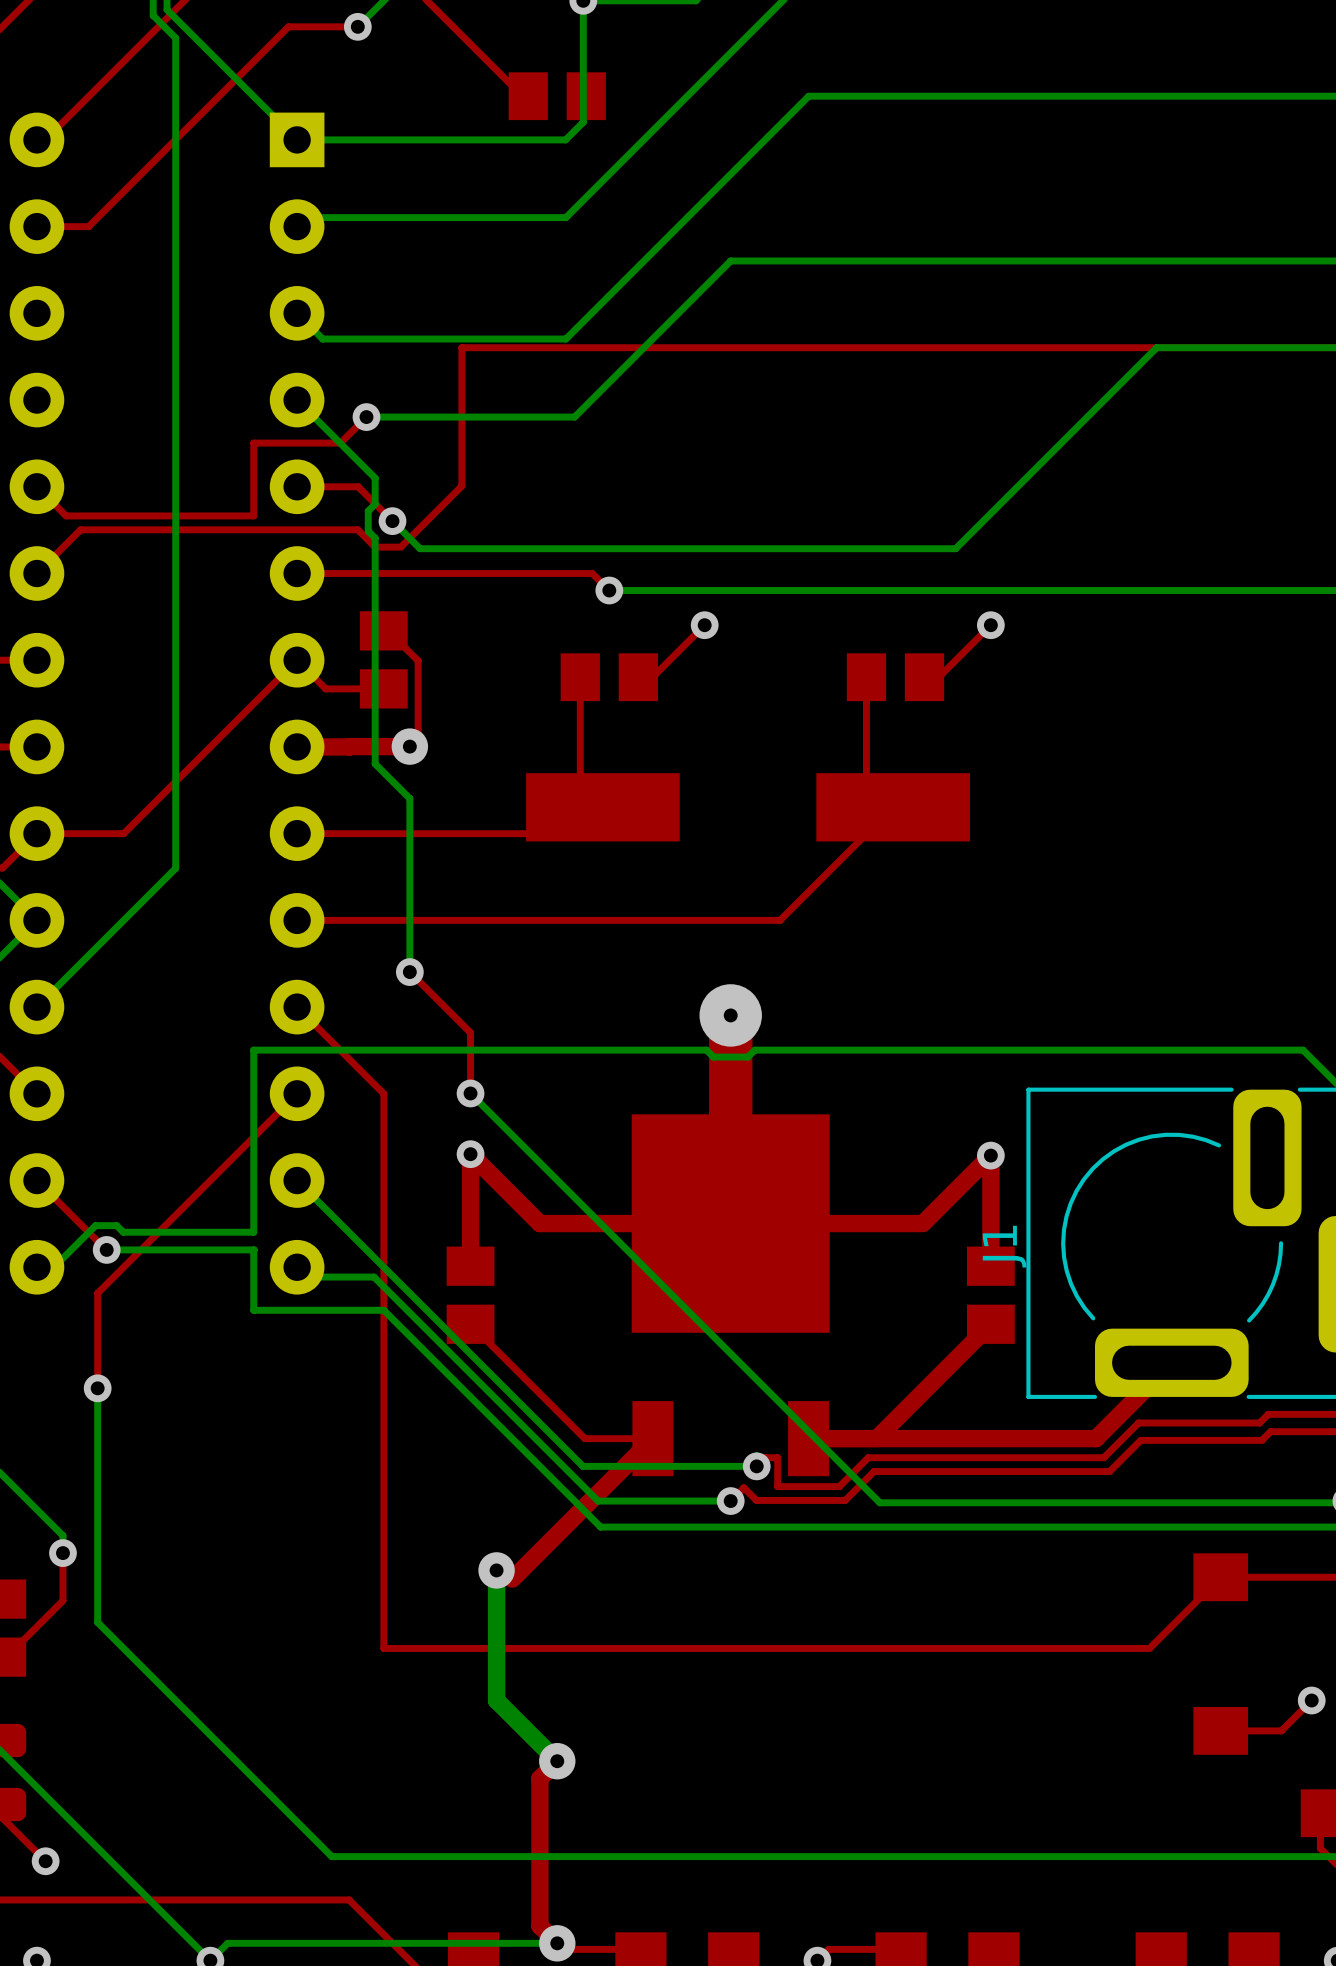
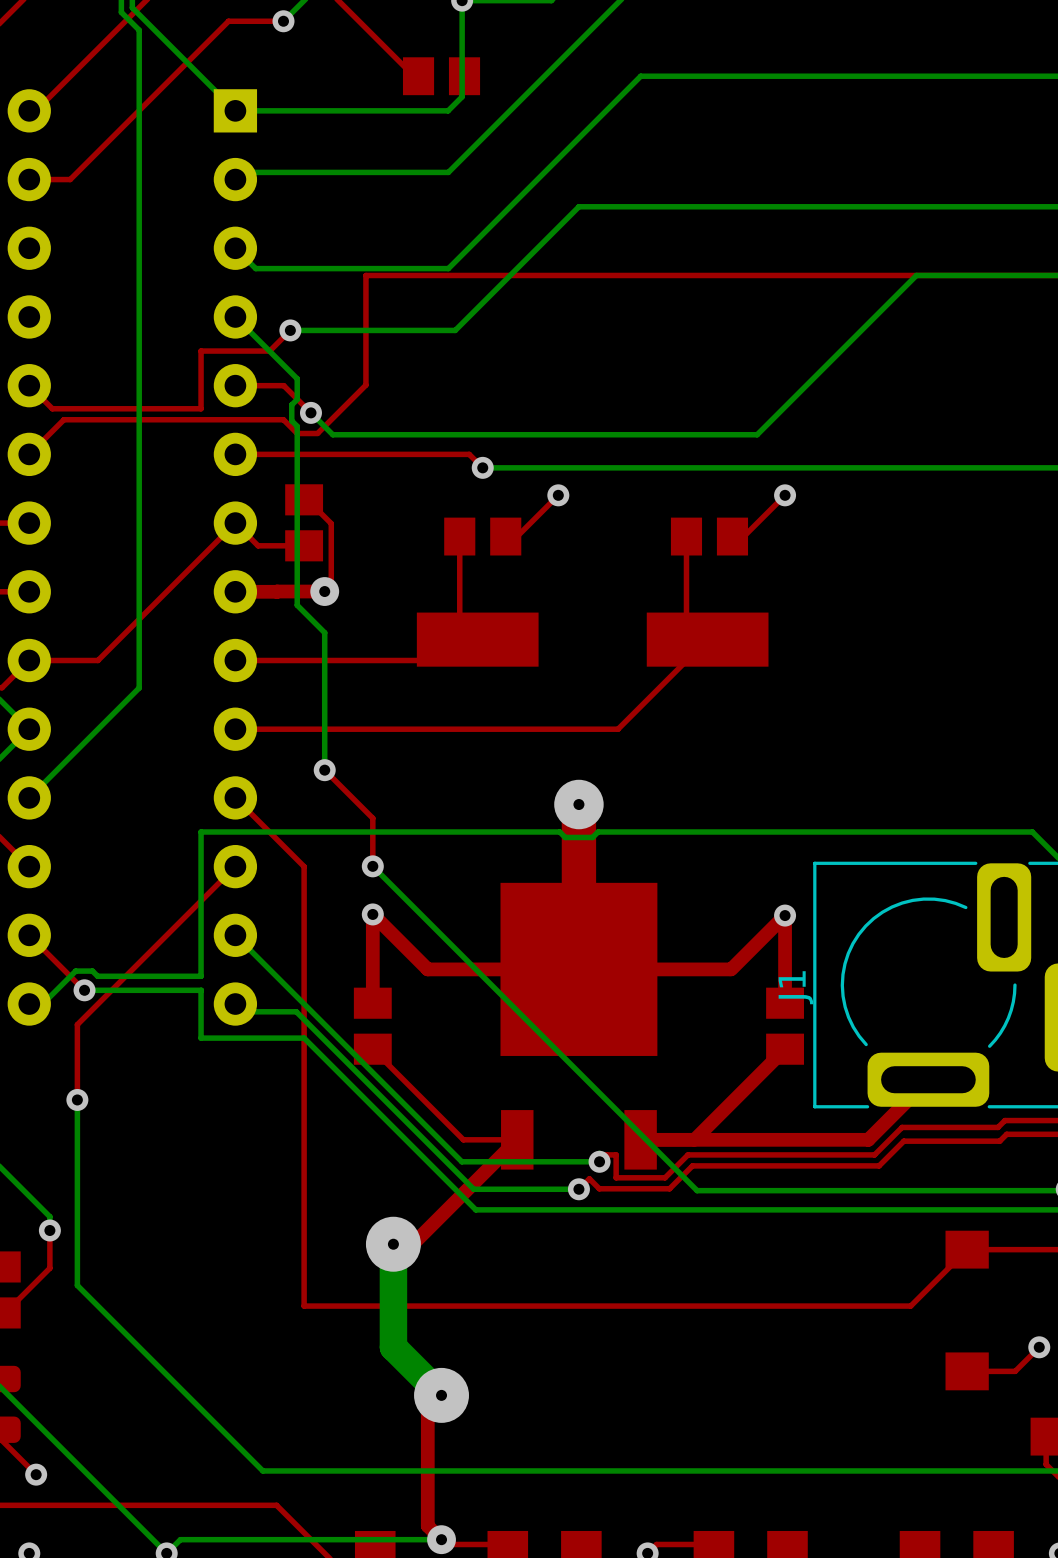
via size: [478, 1552, 515, 1589] -> [365, 1216, 421, 1272]
bottom track width: thin (496, 1570) (496, 1700) (557, 1761) -> thick (393, 1244) (393, 1347) (441, 1395)
via size: [539, 1743, 576, 1780] -> [414, 1367, 470, 1423]

